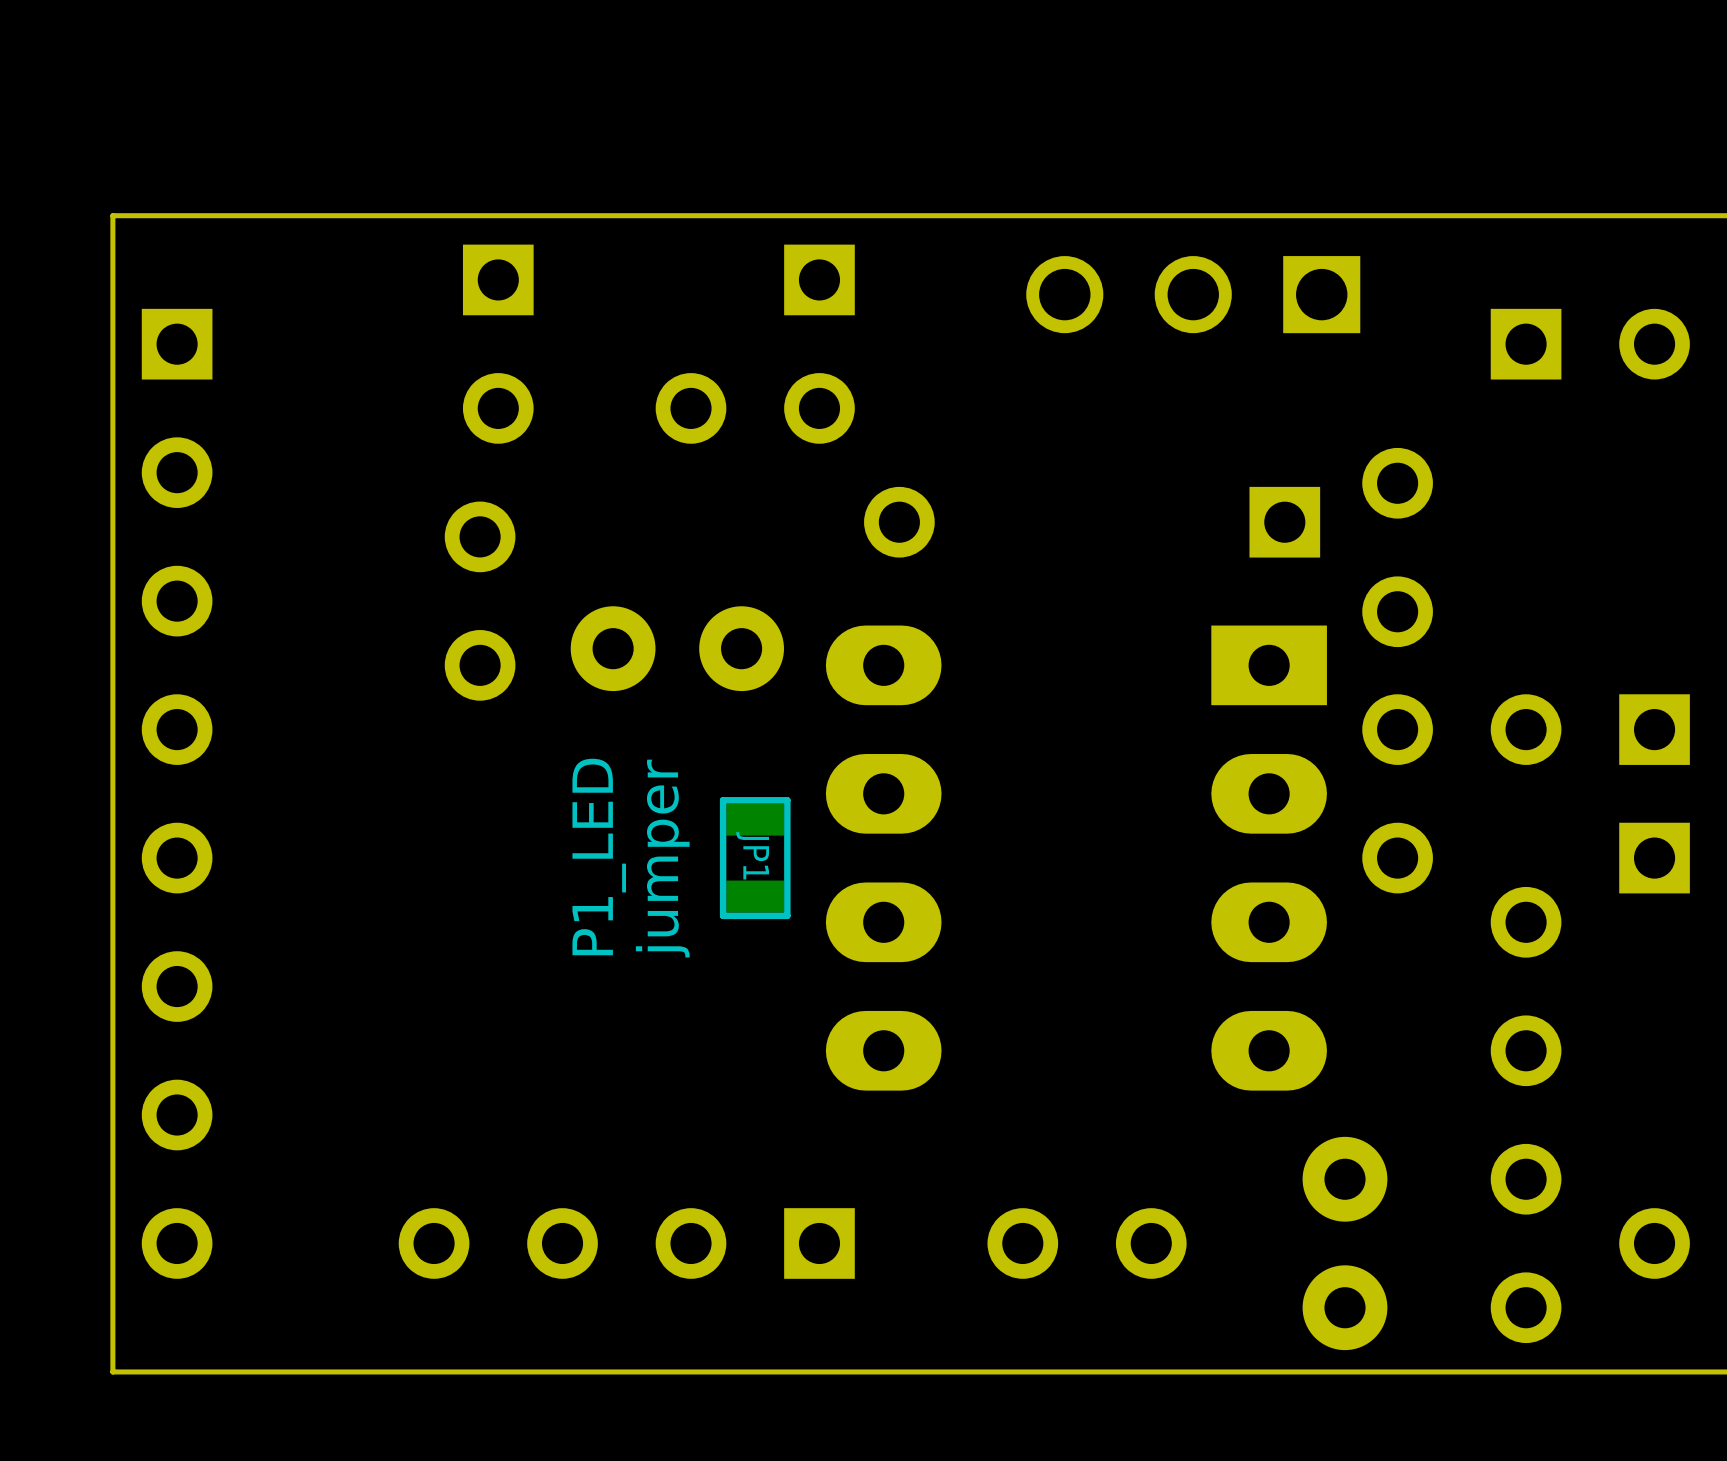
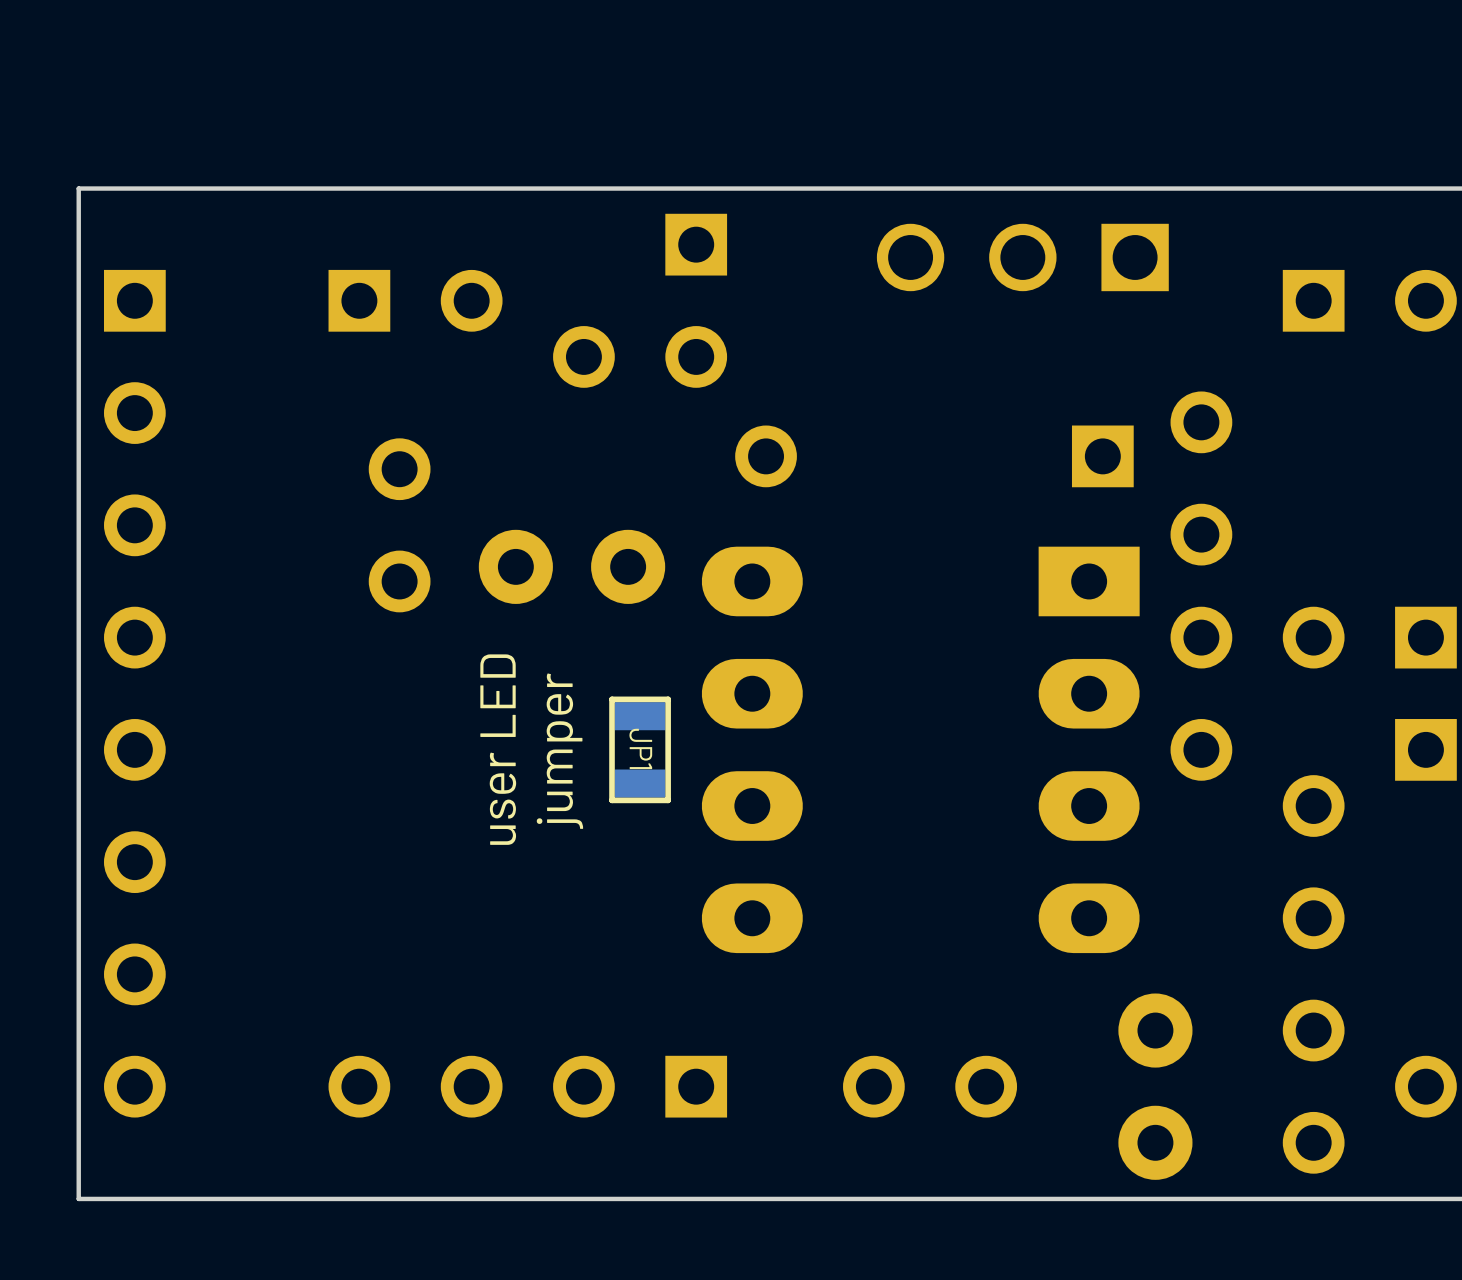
part rotation: 0° (498, 344) -> 90° counterclockwise (415, 300)
text: P1_LED (599, 856) -> user LED (498, 749)

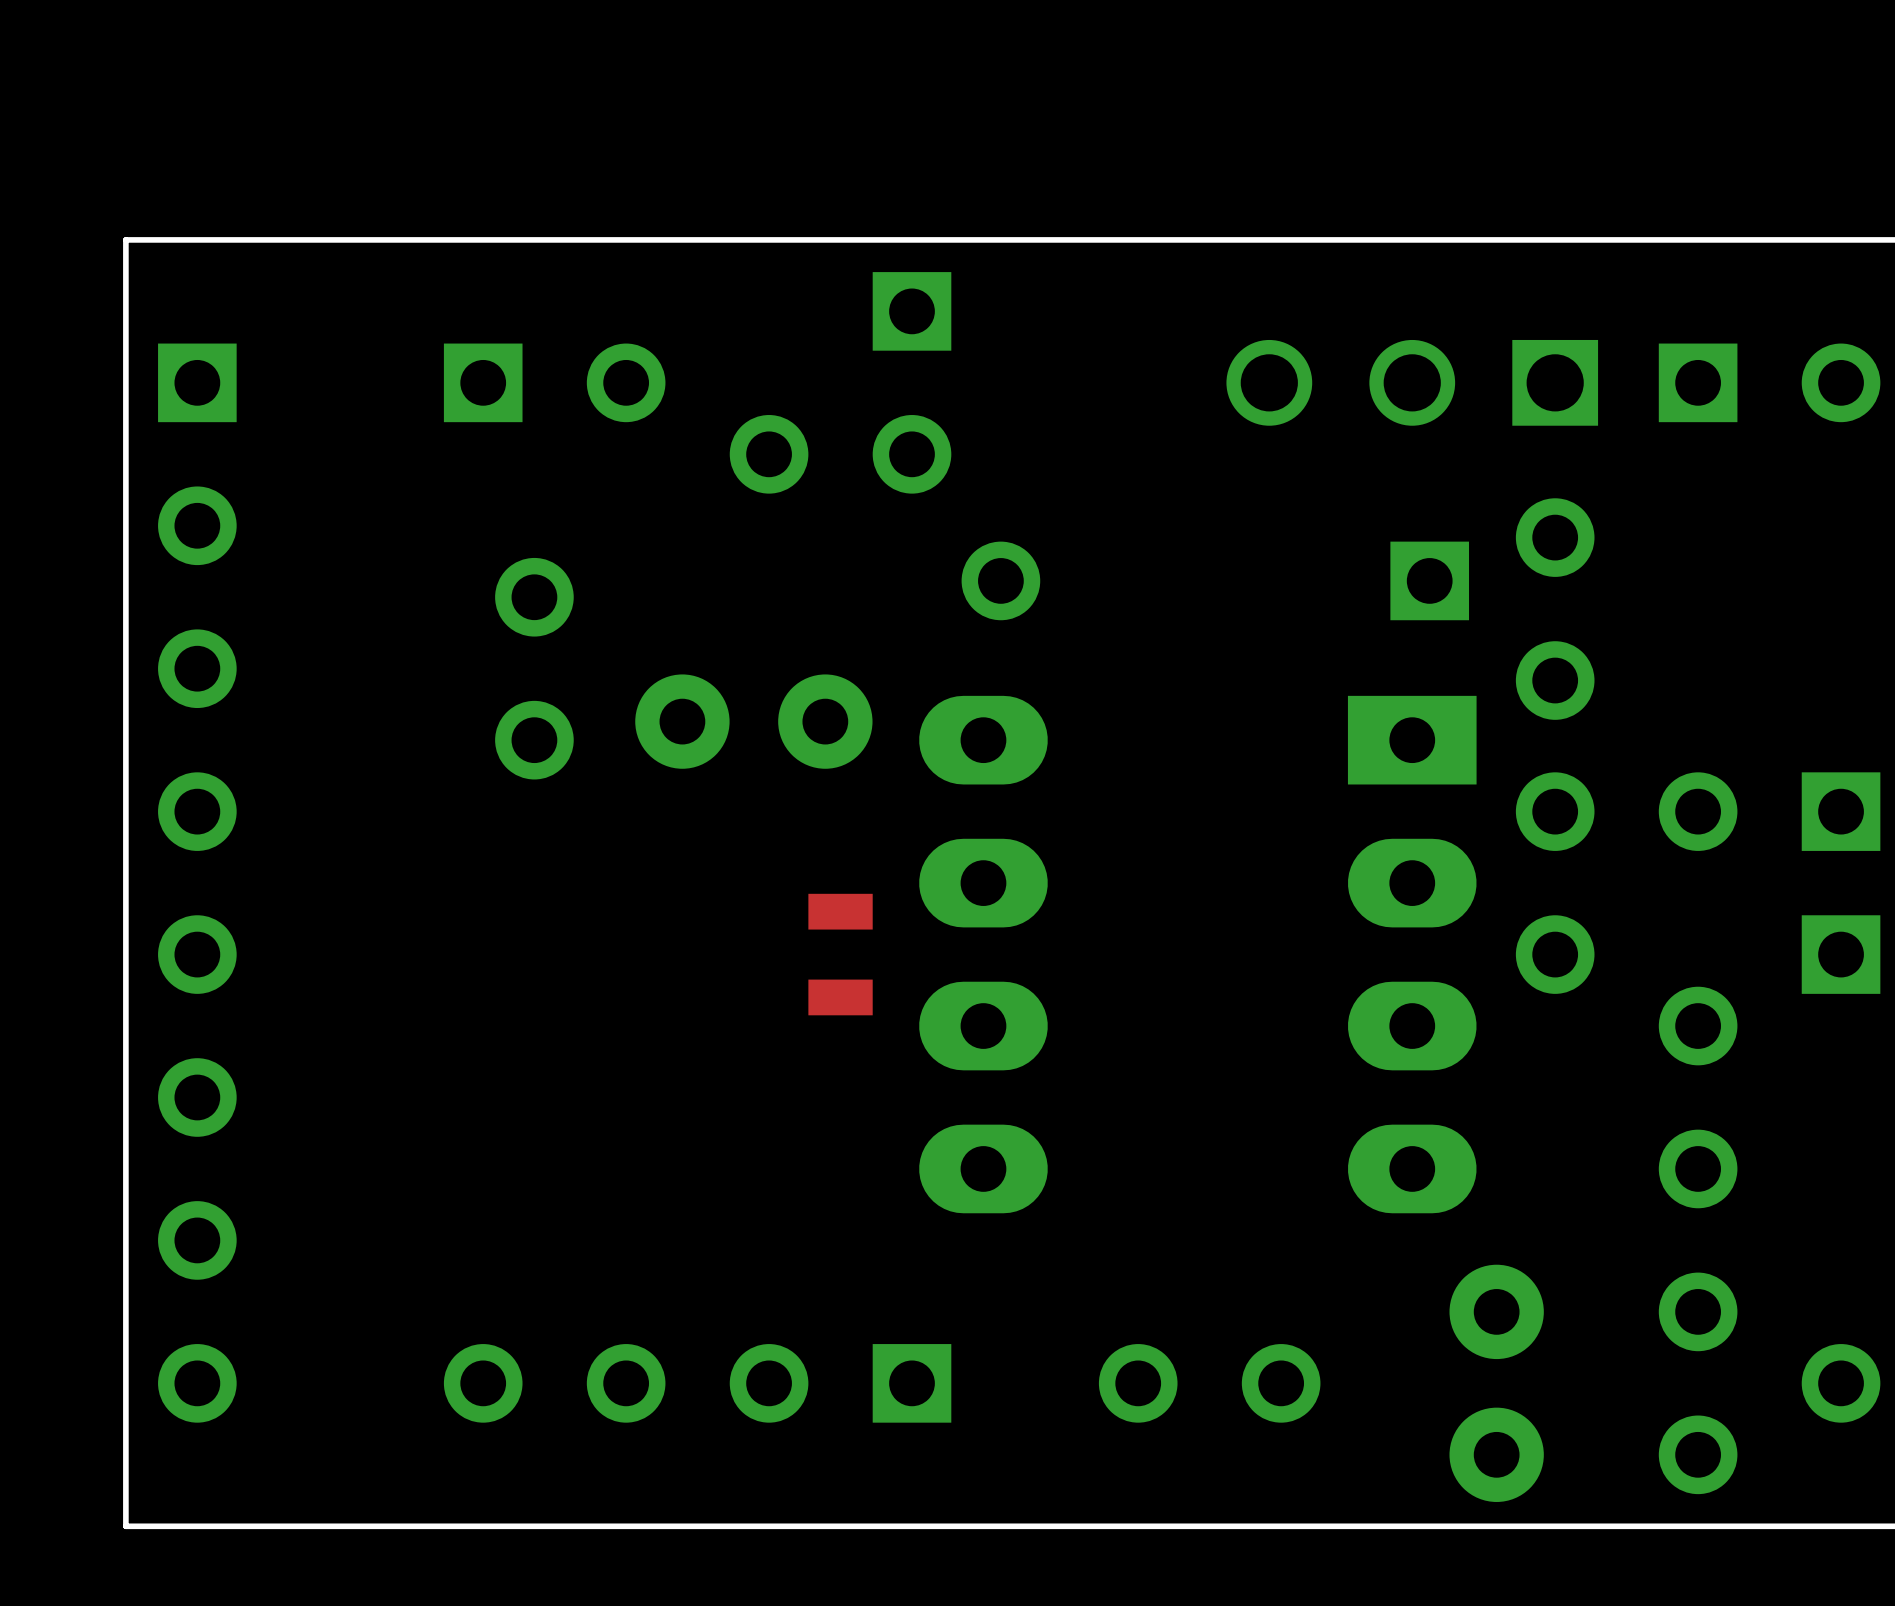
part position: (1022, 257) -> (1412, 382)
text: user LED (498, 749) -> none
JP1 side: bottom (640, 749) -> top (840, 954)
text: jumper (559, 751) -> none

